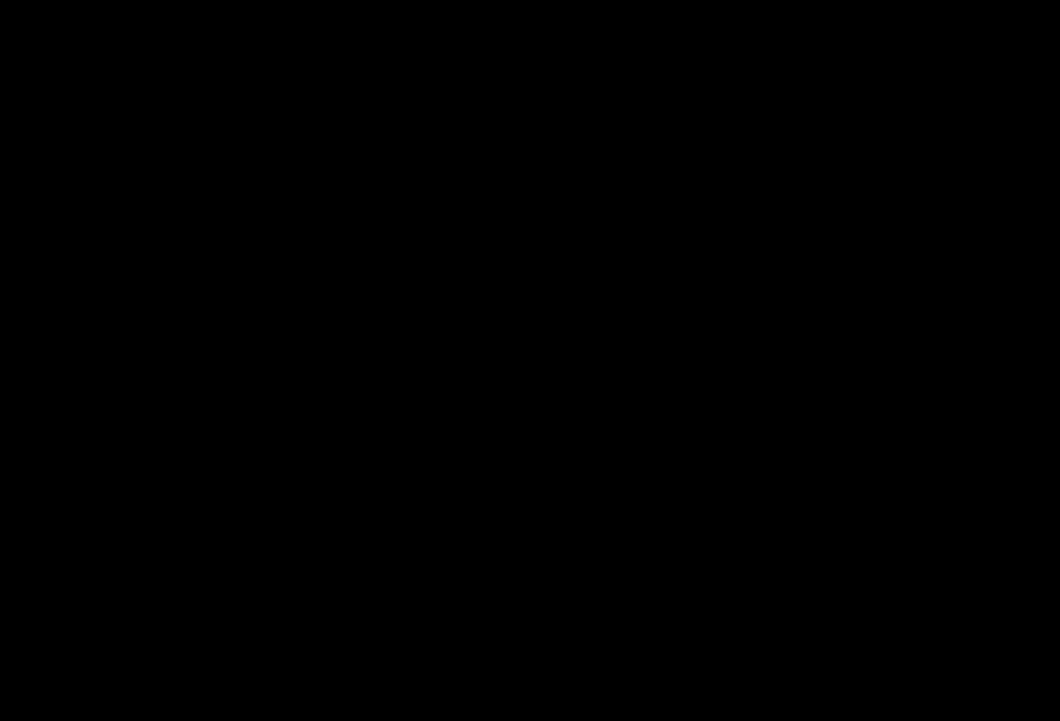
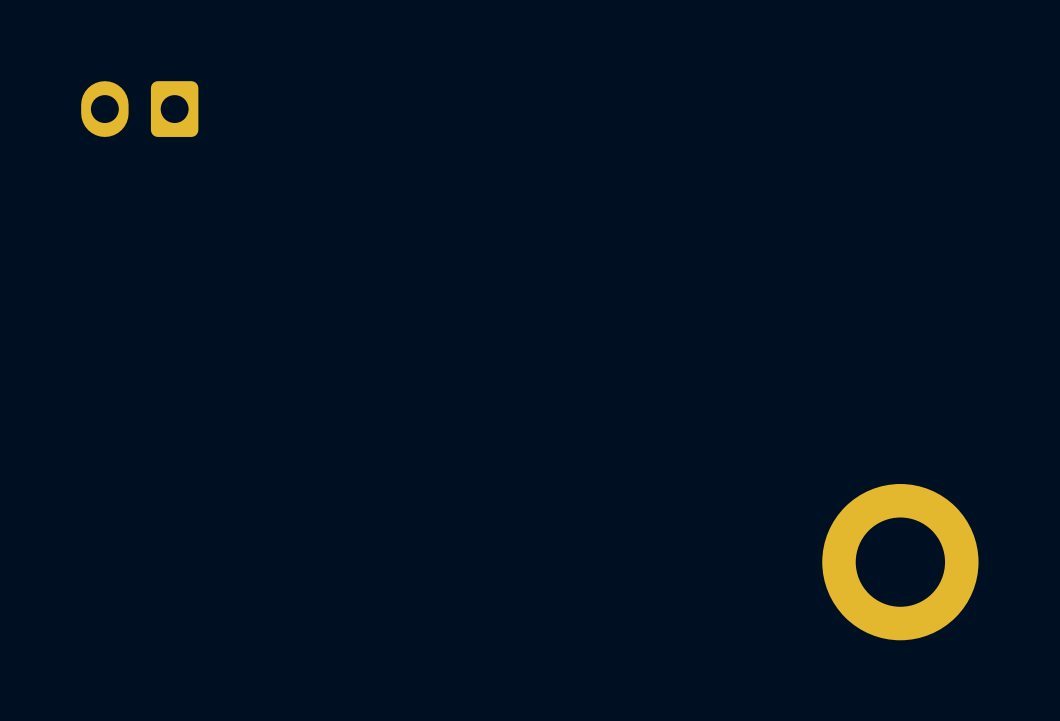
part: none -> (139, 109)
part: none -> (900, 562)

